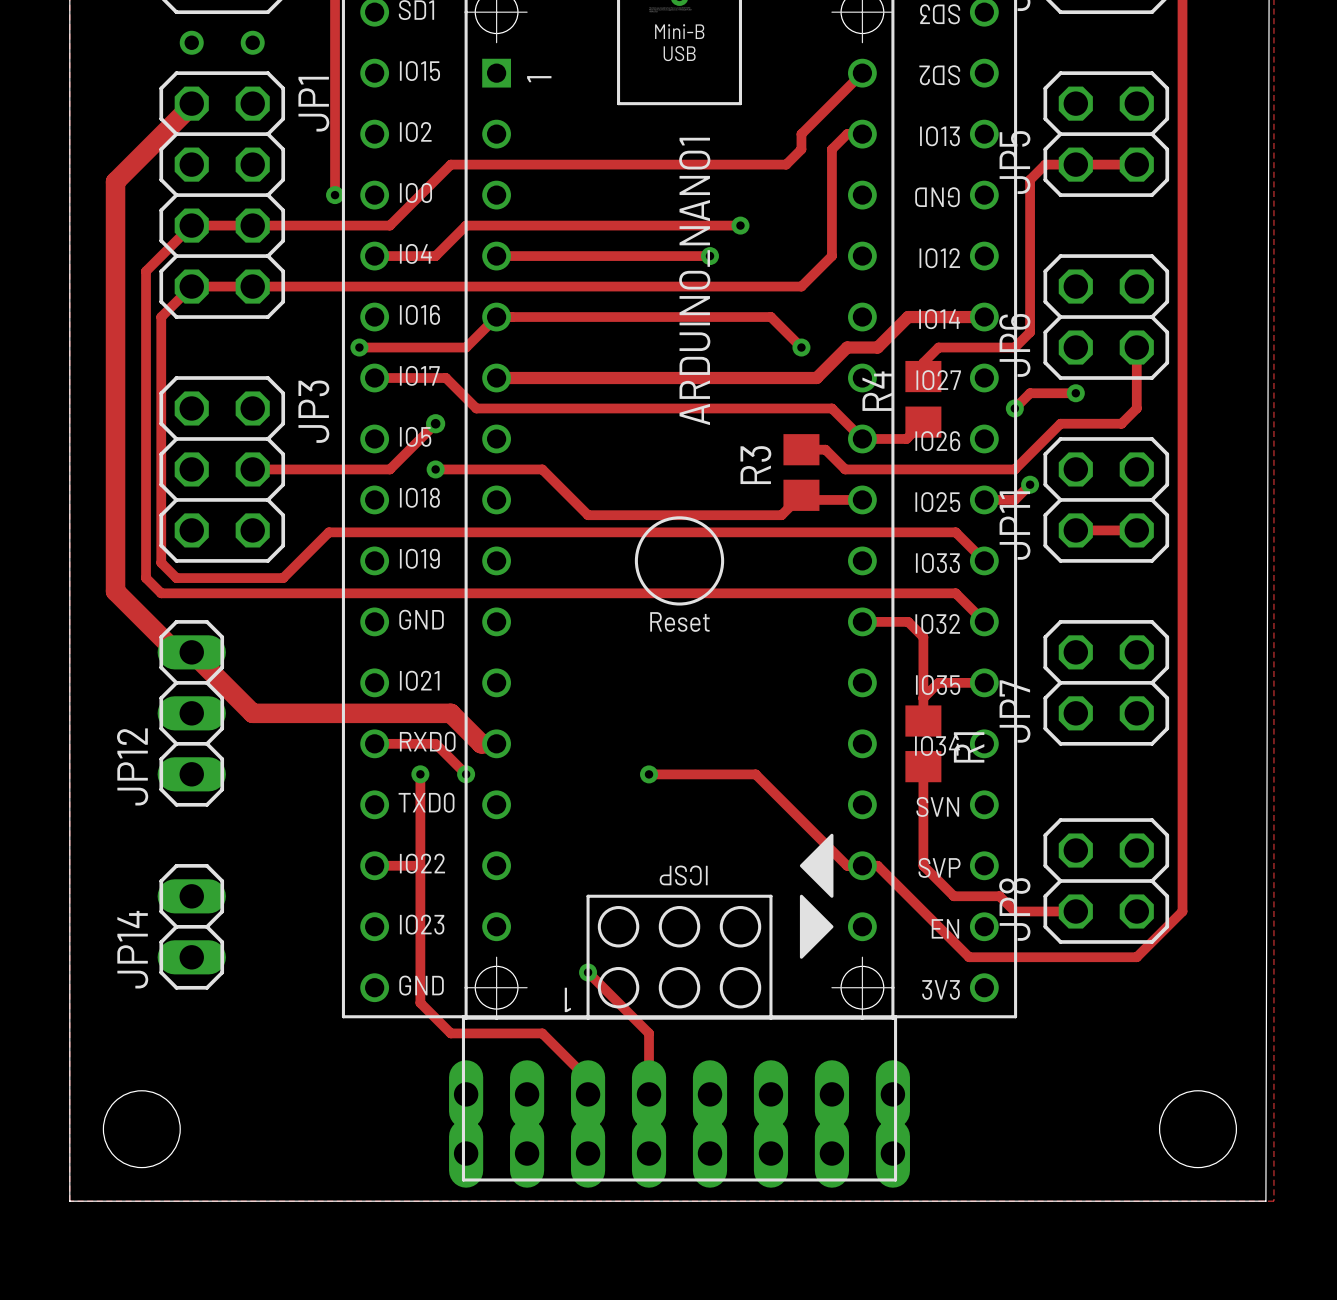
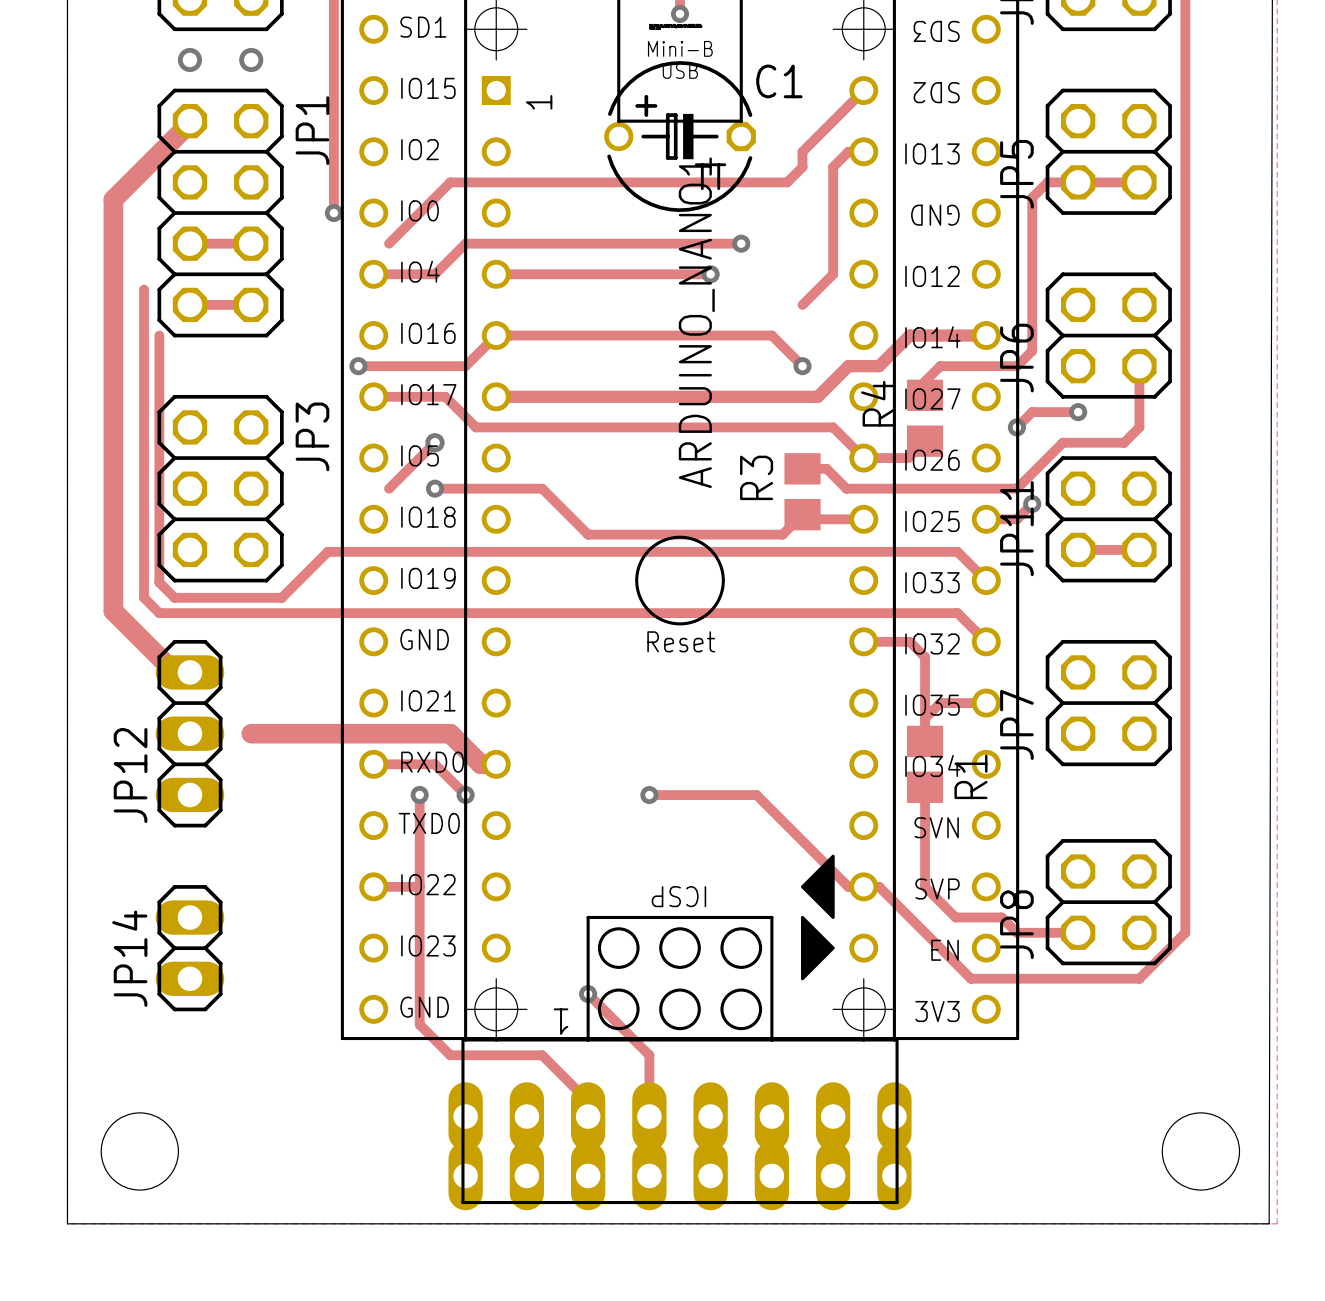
C1: none -> (680, 136)
track: (191, 225) (146, 271) -> none
track: (252, 225) (389, 225) -> none
track: (191, 286) (161, 317) -> none
track: (252, 286) (801, 286) -> none
track: (252, 469) (389, 469) -> none
track: (176, 652) (191, 652) (252, 713) -> none

